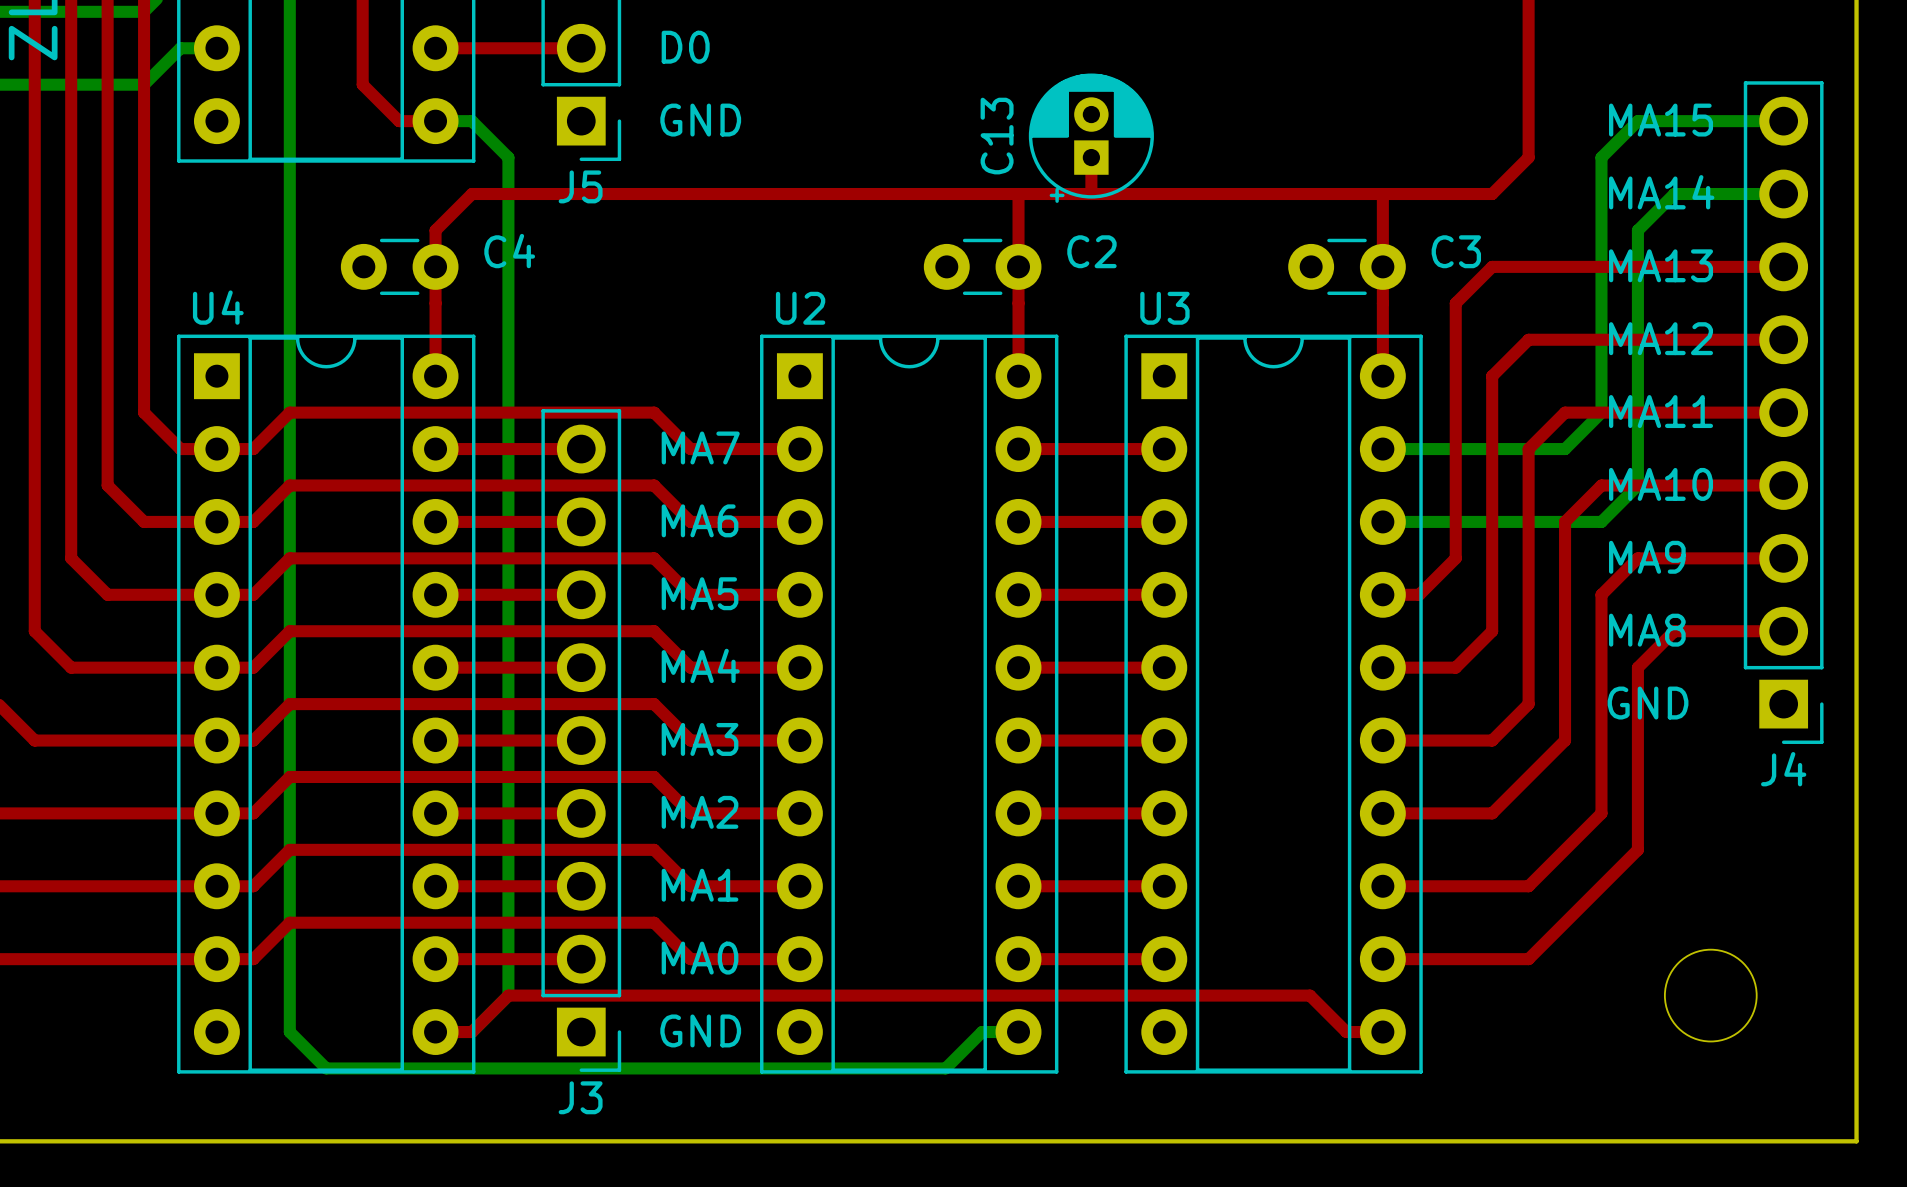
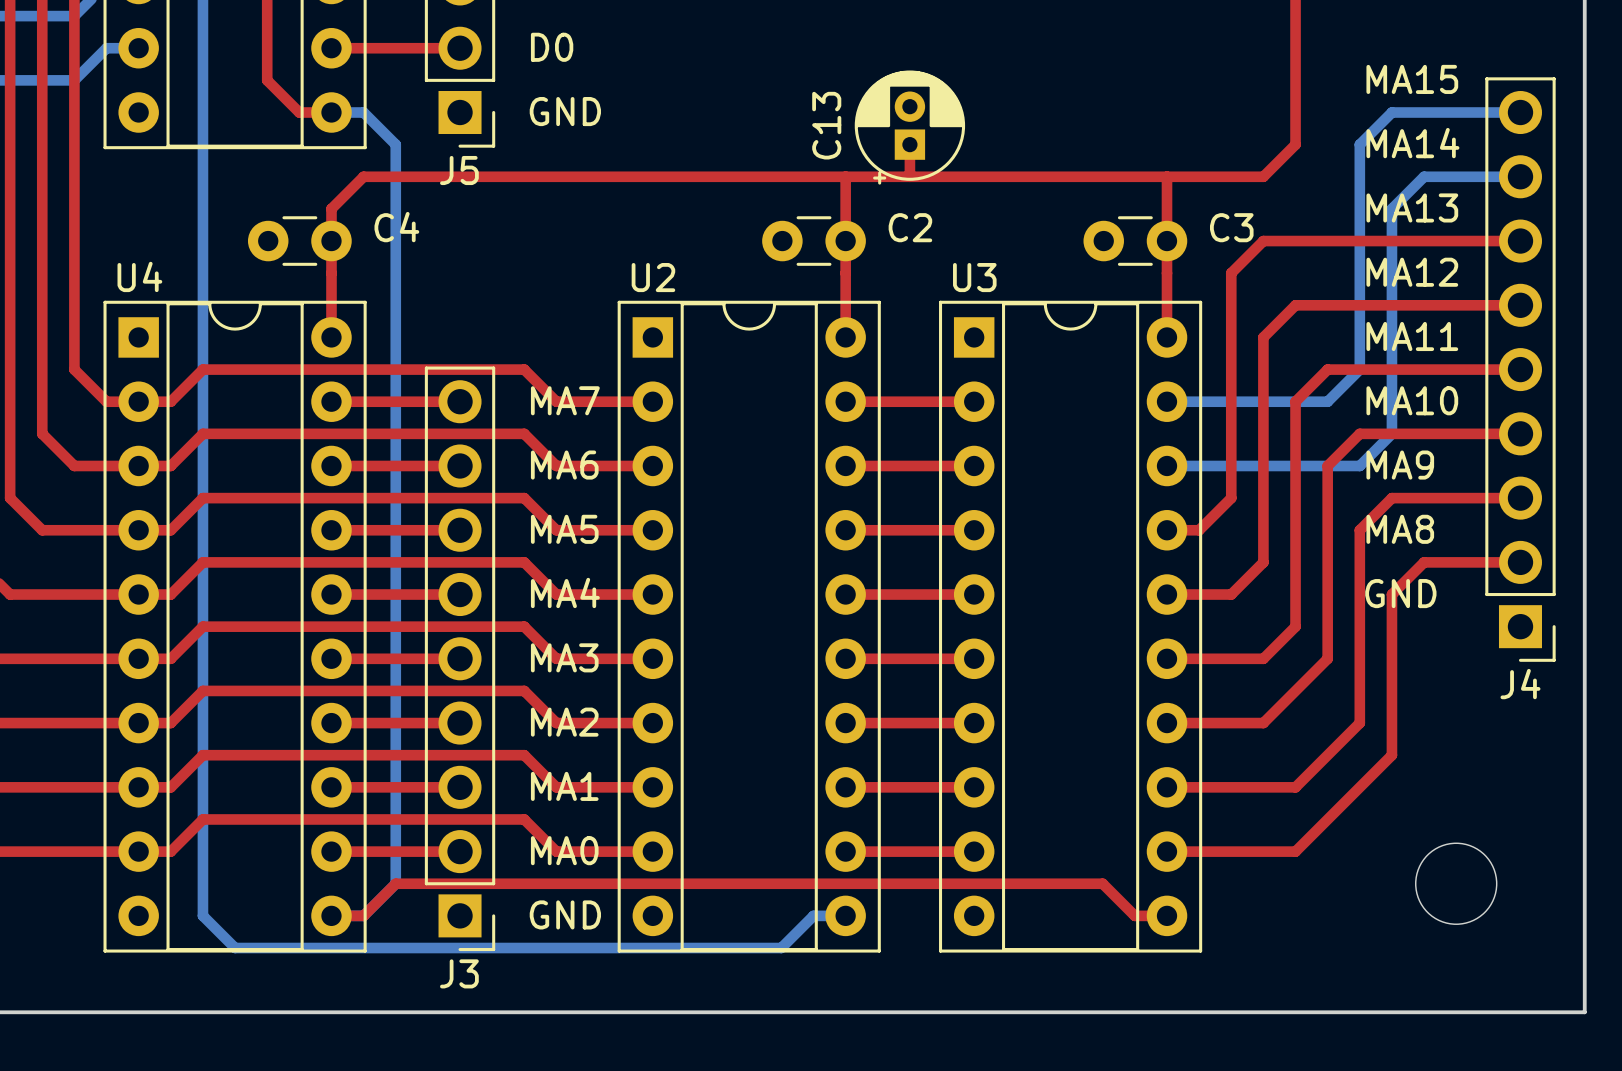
text position: MA15 (1661, 120) -> MA15 (1412, 79)
text position: MA14 (1661, 192) -> MA14 (1412, 143)
text position: MA13 (1661, 265) -> MA13 (1412, 207)
text position: MA12 (1661, 338) -> MA12 (1412, 272)
text position: MA11 (1661, 411) -> MA11 (1412, 336)
text position: MA10 (1661, 484) -> MA10 (1412, 400)
text position: MA9 (1647, 557) -> MA9 (1400, 465)
text position: MA8 (1647, 630) -> MA8 (1400, 529)
text position: GND (1648, 703) -> GND (1400, 593)

